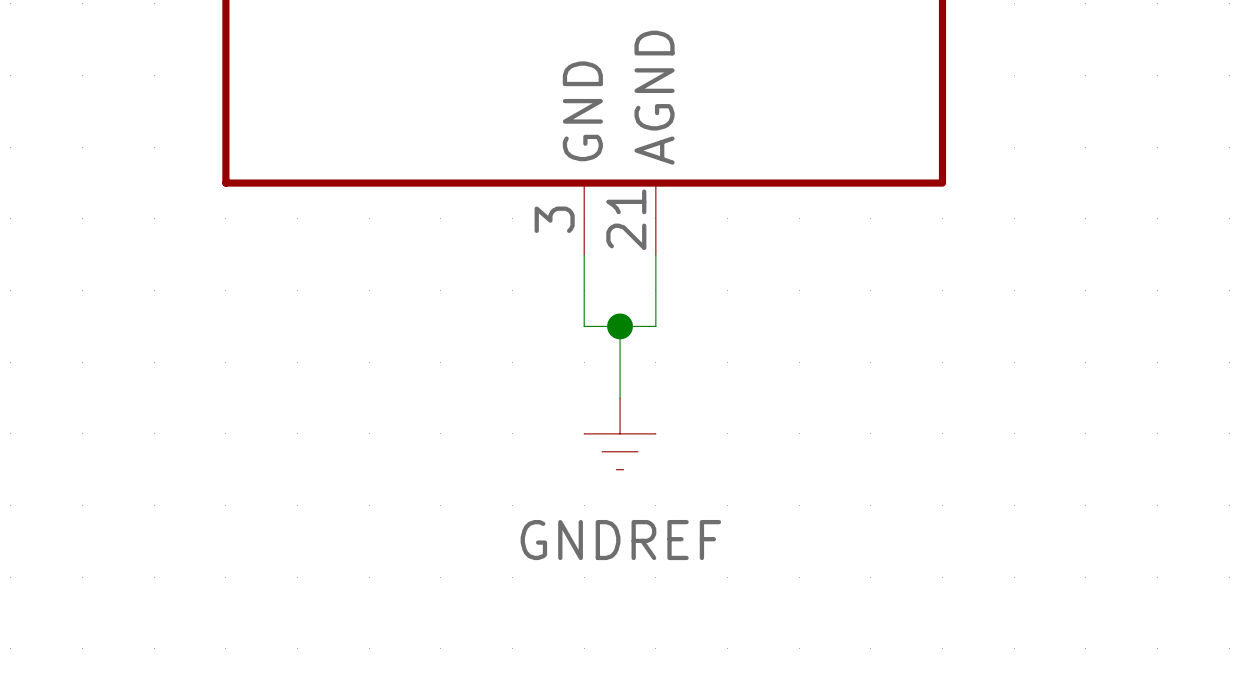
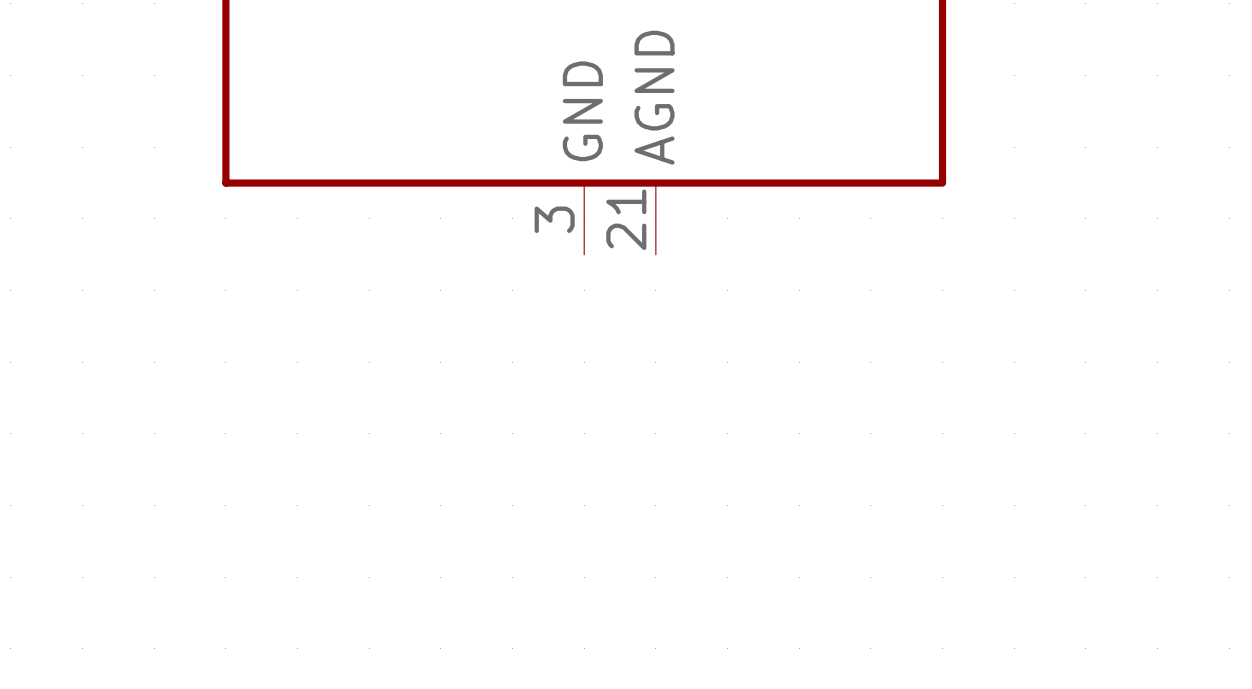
wire: (584, 254) (584, 326) (655, 326) (655, 254) -> none
wire: (620, 326) (620, 398) -> none
junction: (620, 326) -> none
power symbol: GNDREF (620, 433) -> none

